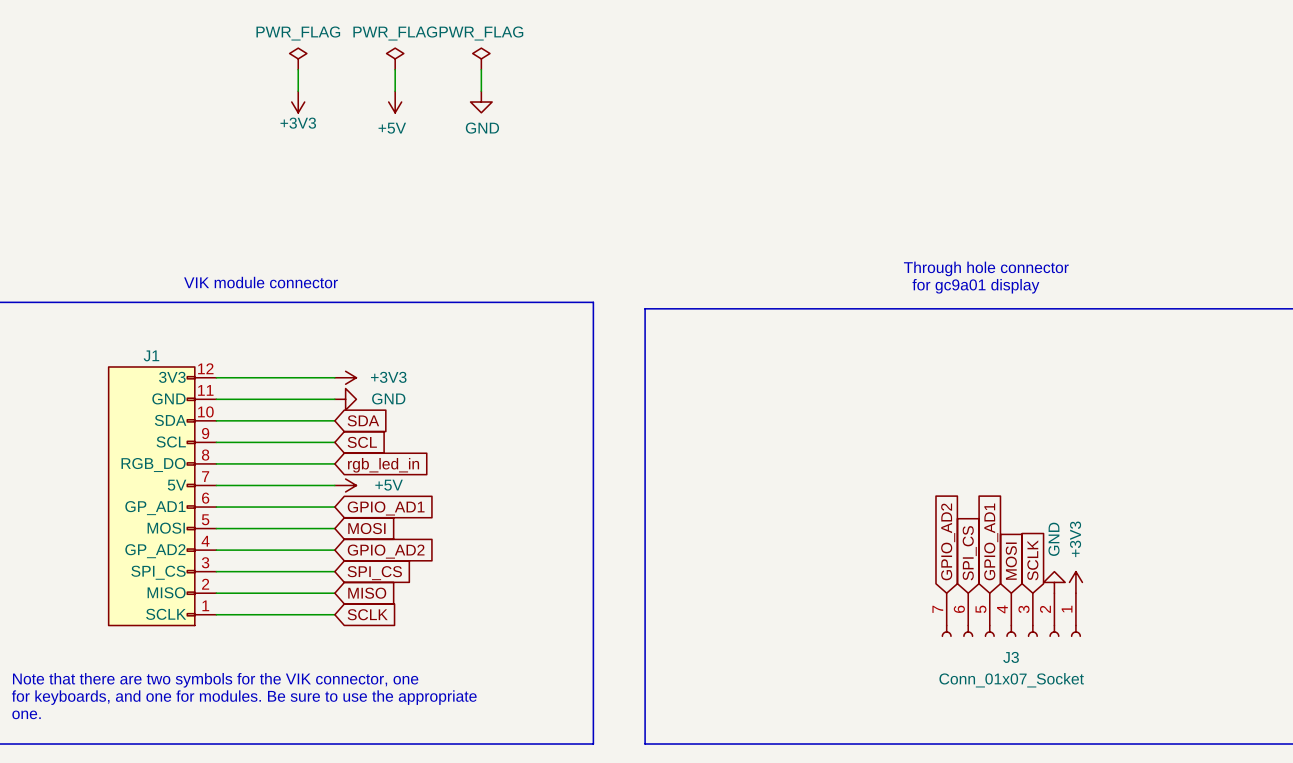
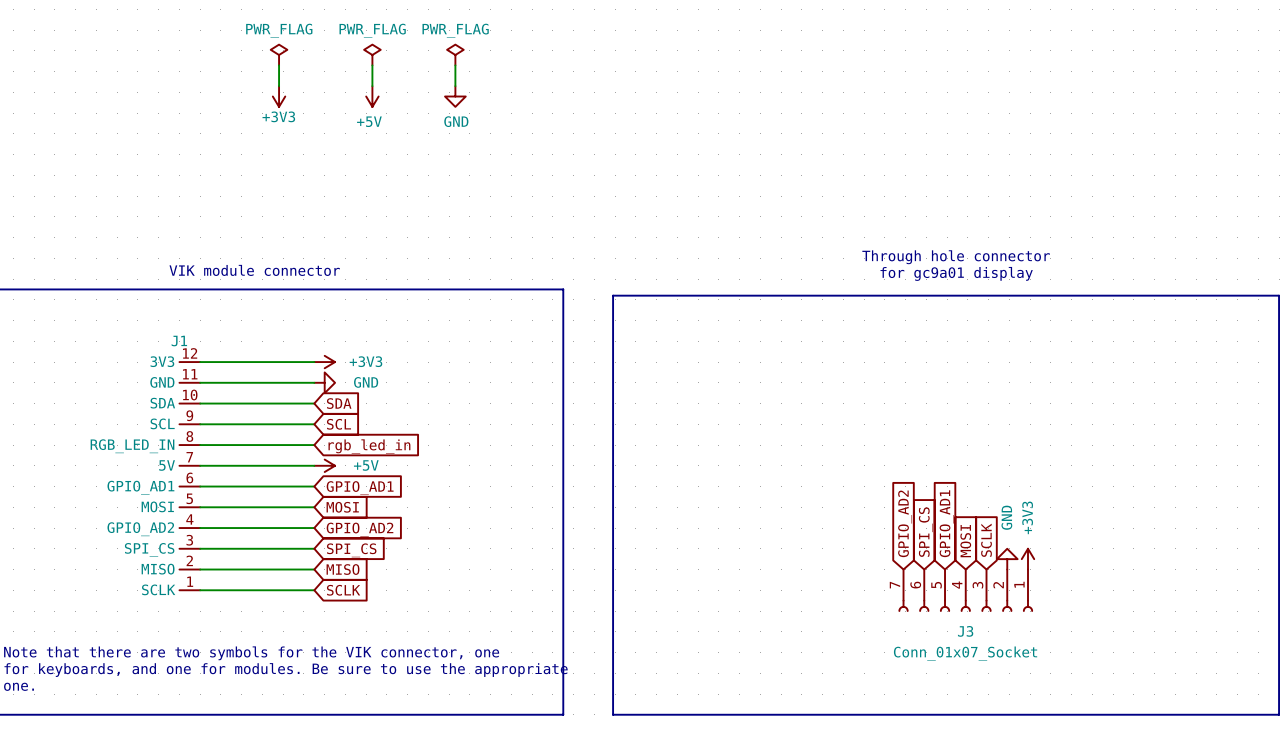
J1 symbol: [108, 366, 217, 626] -> [179, 362, 201, 591]

